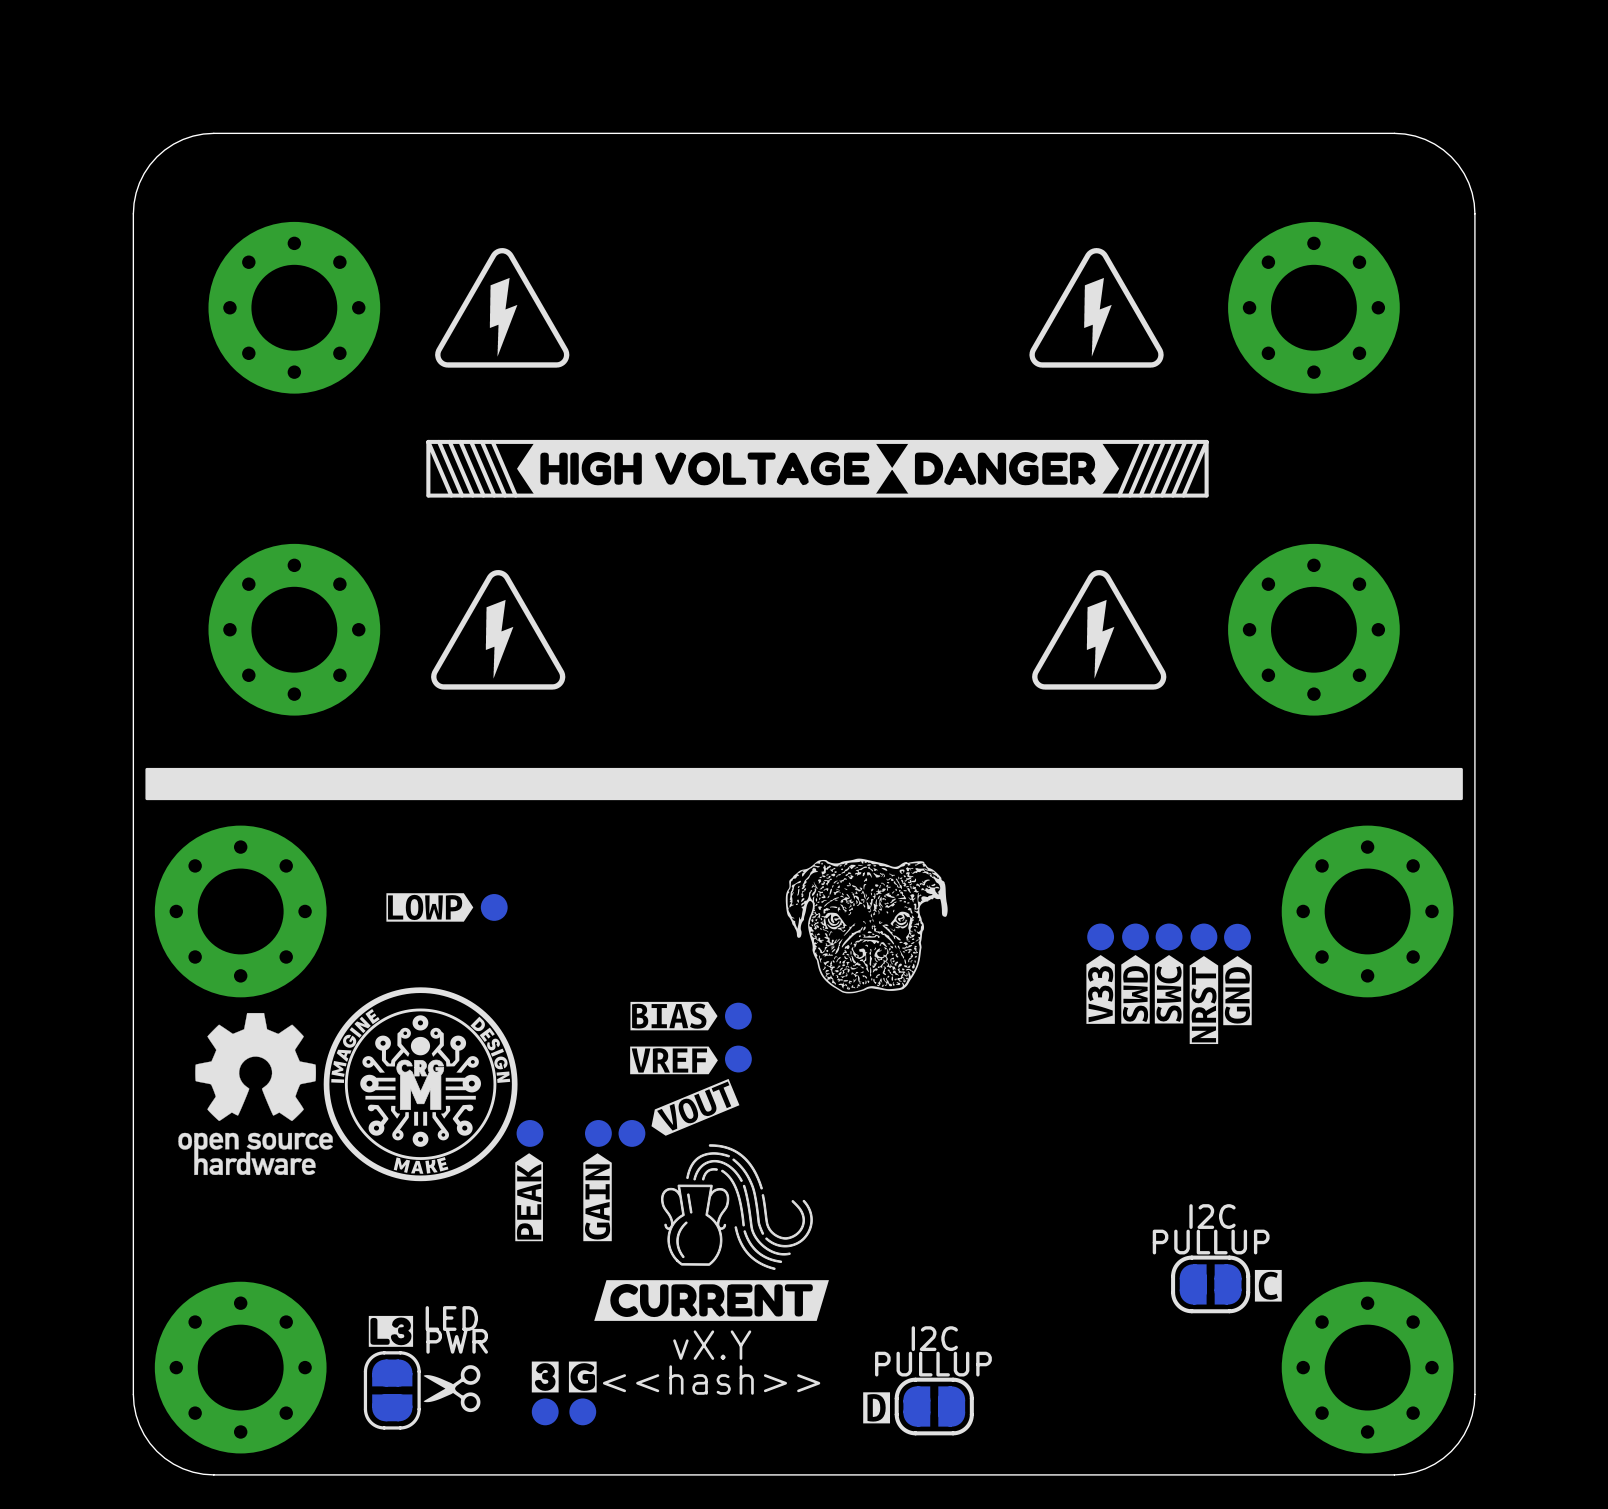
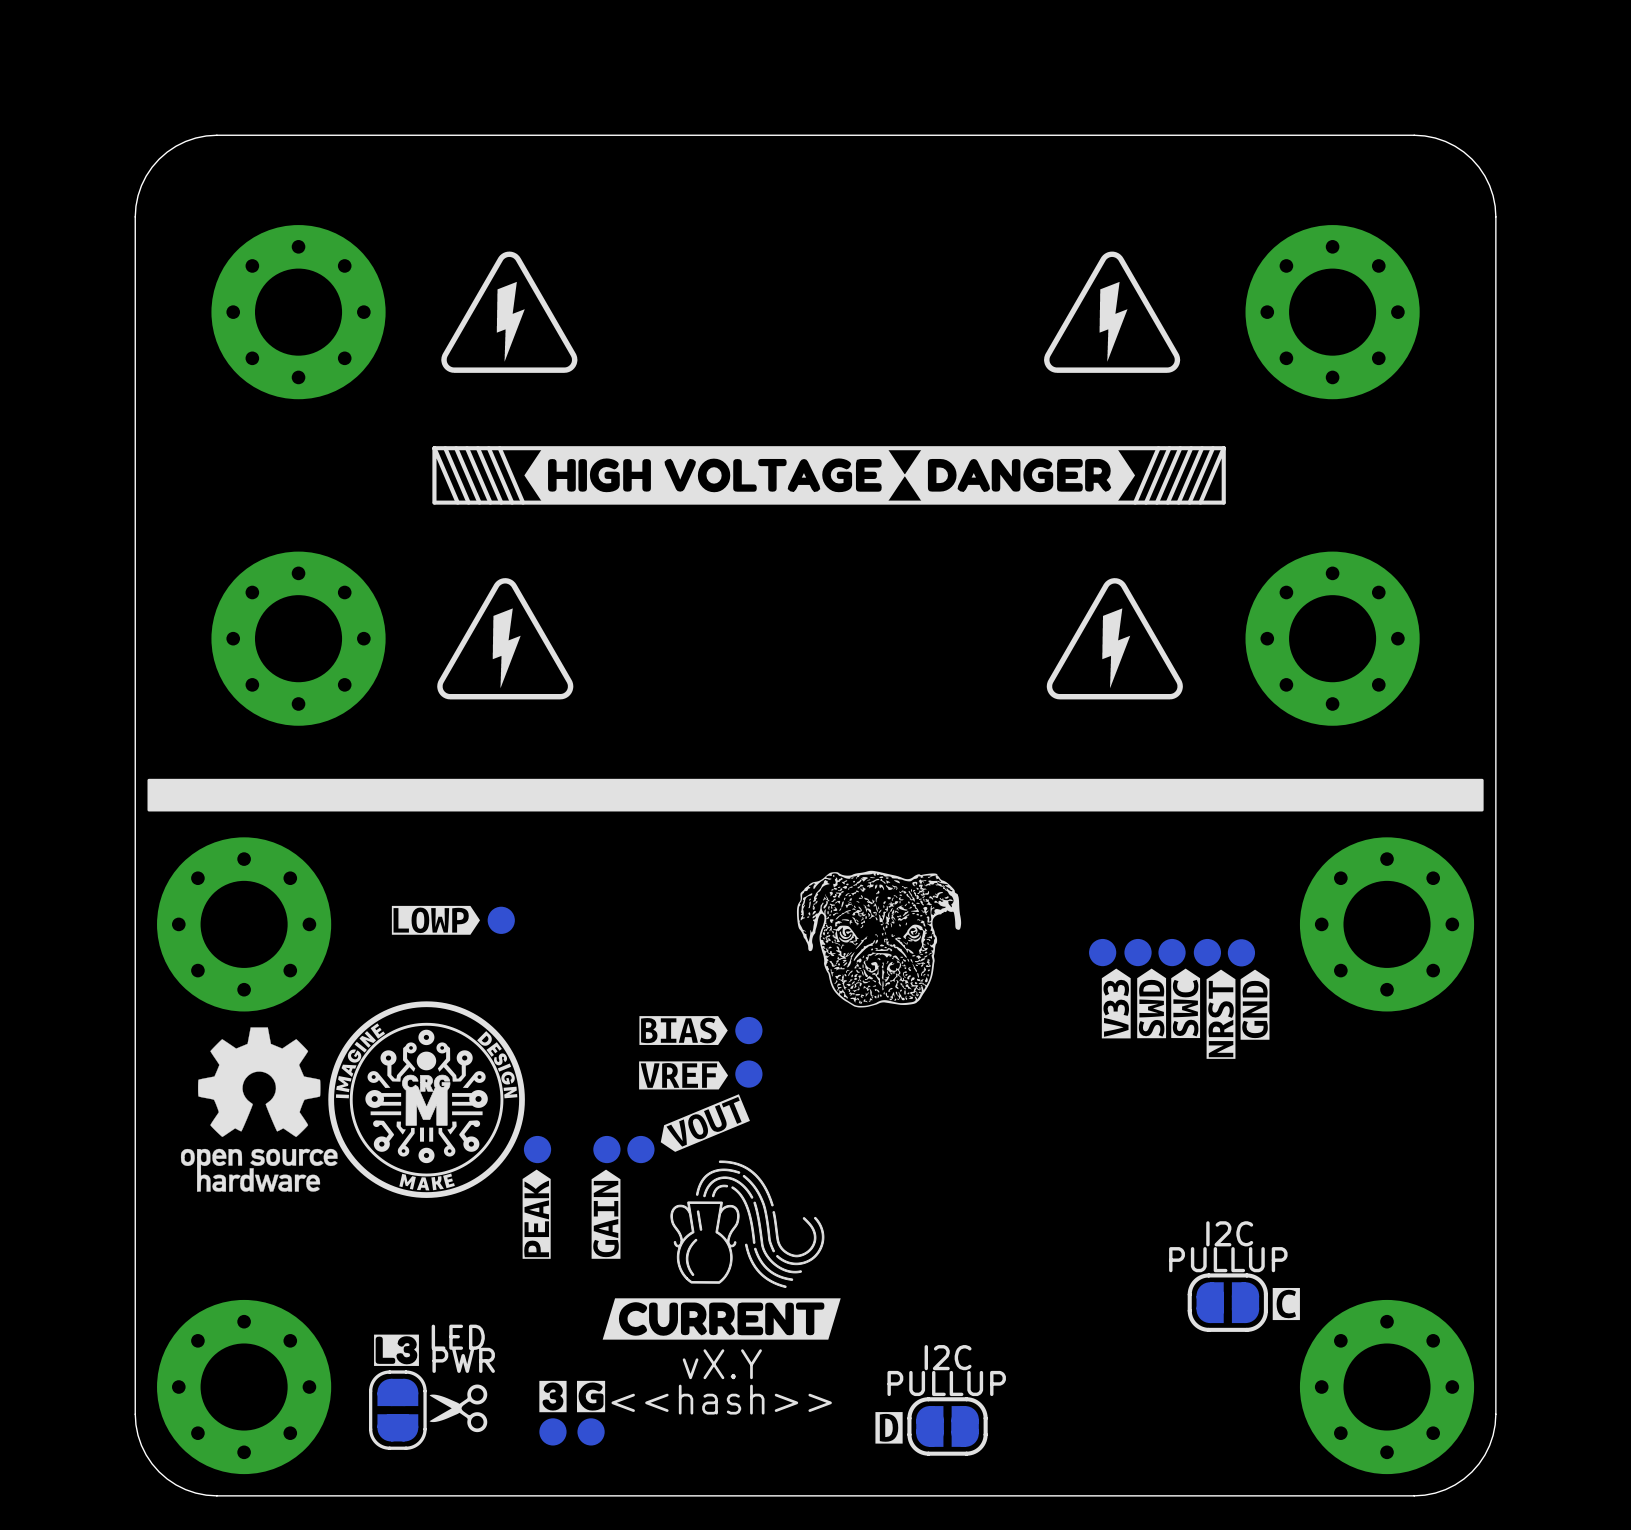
part: (1100, 936) -> none
part: (1135, 936) -> none
part: (1169, 936) -> none
part: (1203, 936) -> none
part: (1237, 937) -> none
part: none -> (1102, 952)
part: none -> (1138, 952)
part: none -> (1172, 952)
part: none -> (1207, 952)
part: none -> (1241, 952)

